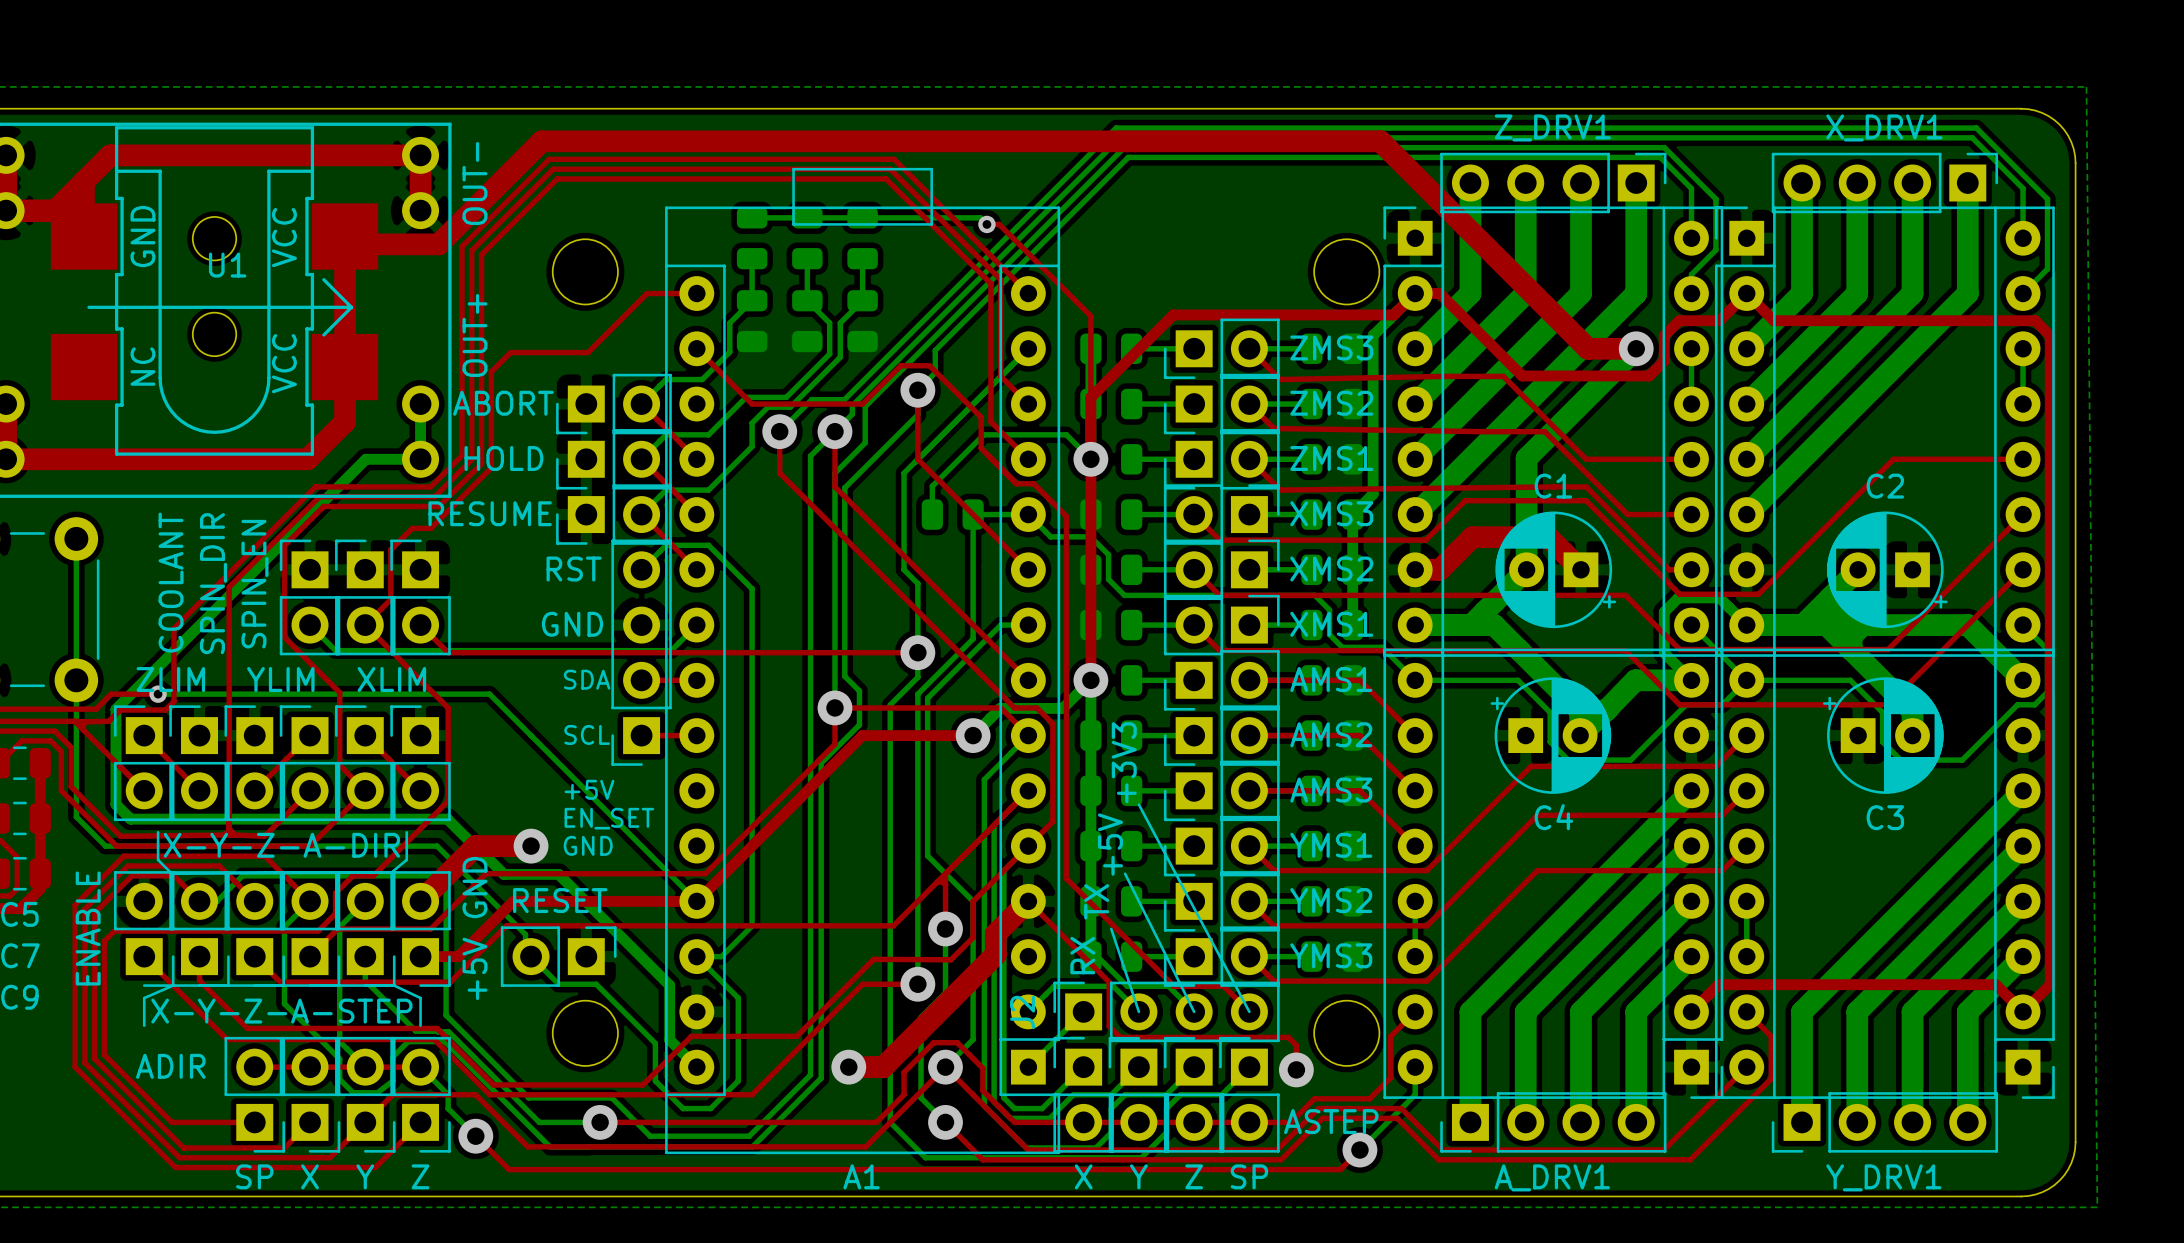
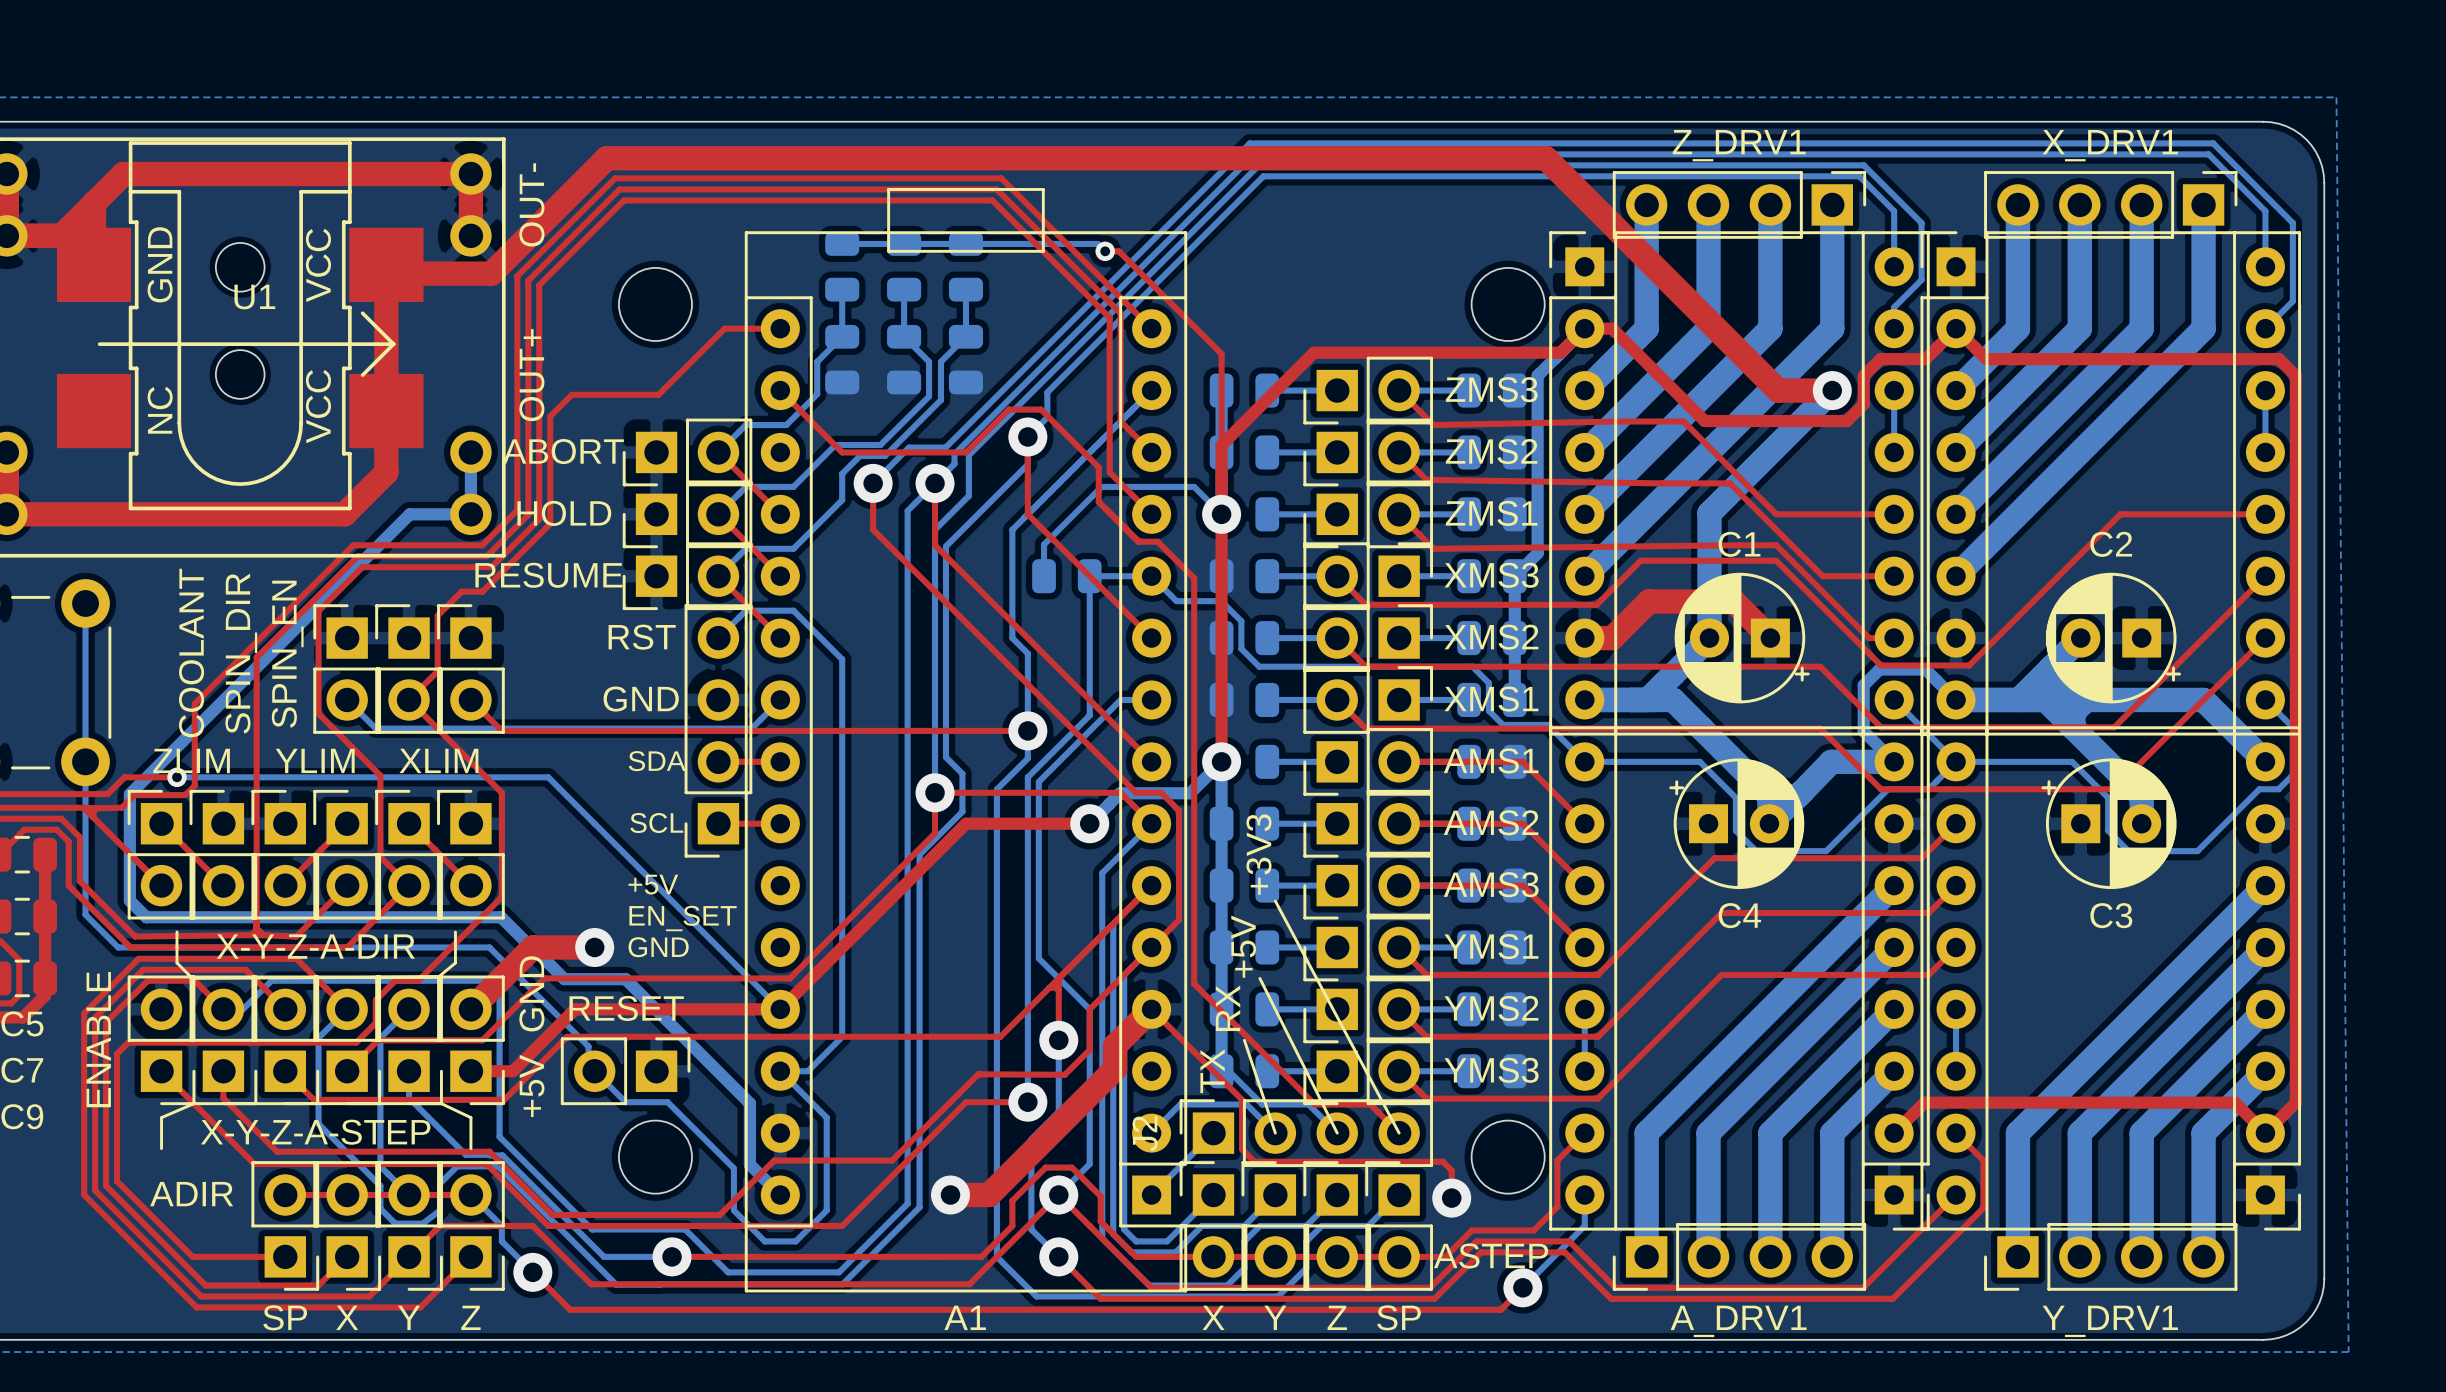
text: TX (1096, 901) -> RX (1228, 1008)
text: RX (1082, 955) -> TX (1212, 1071)

